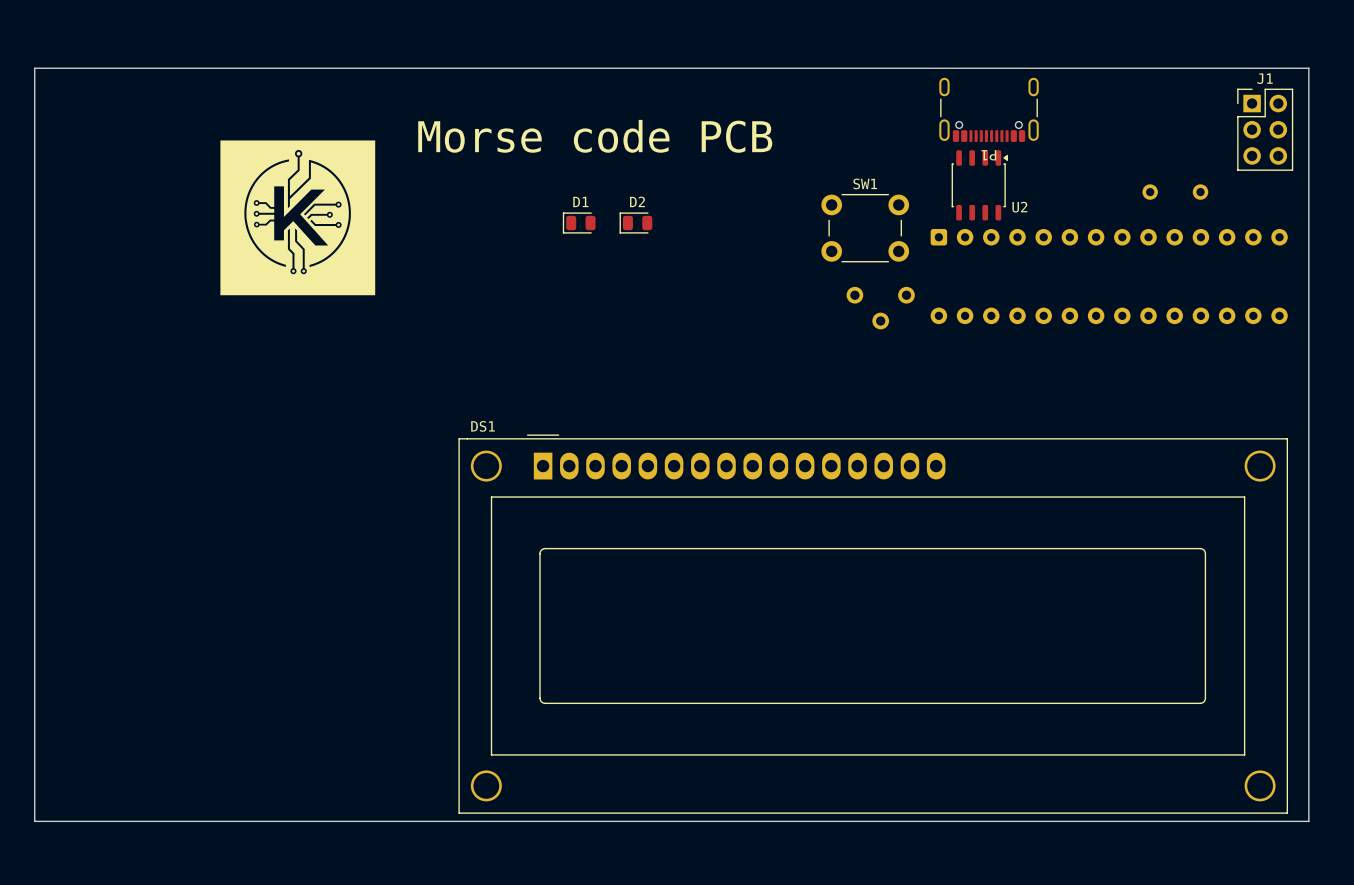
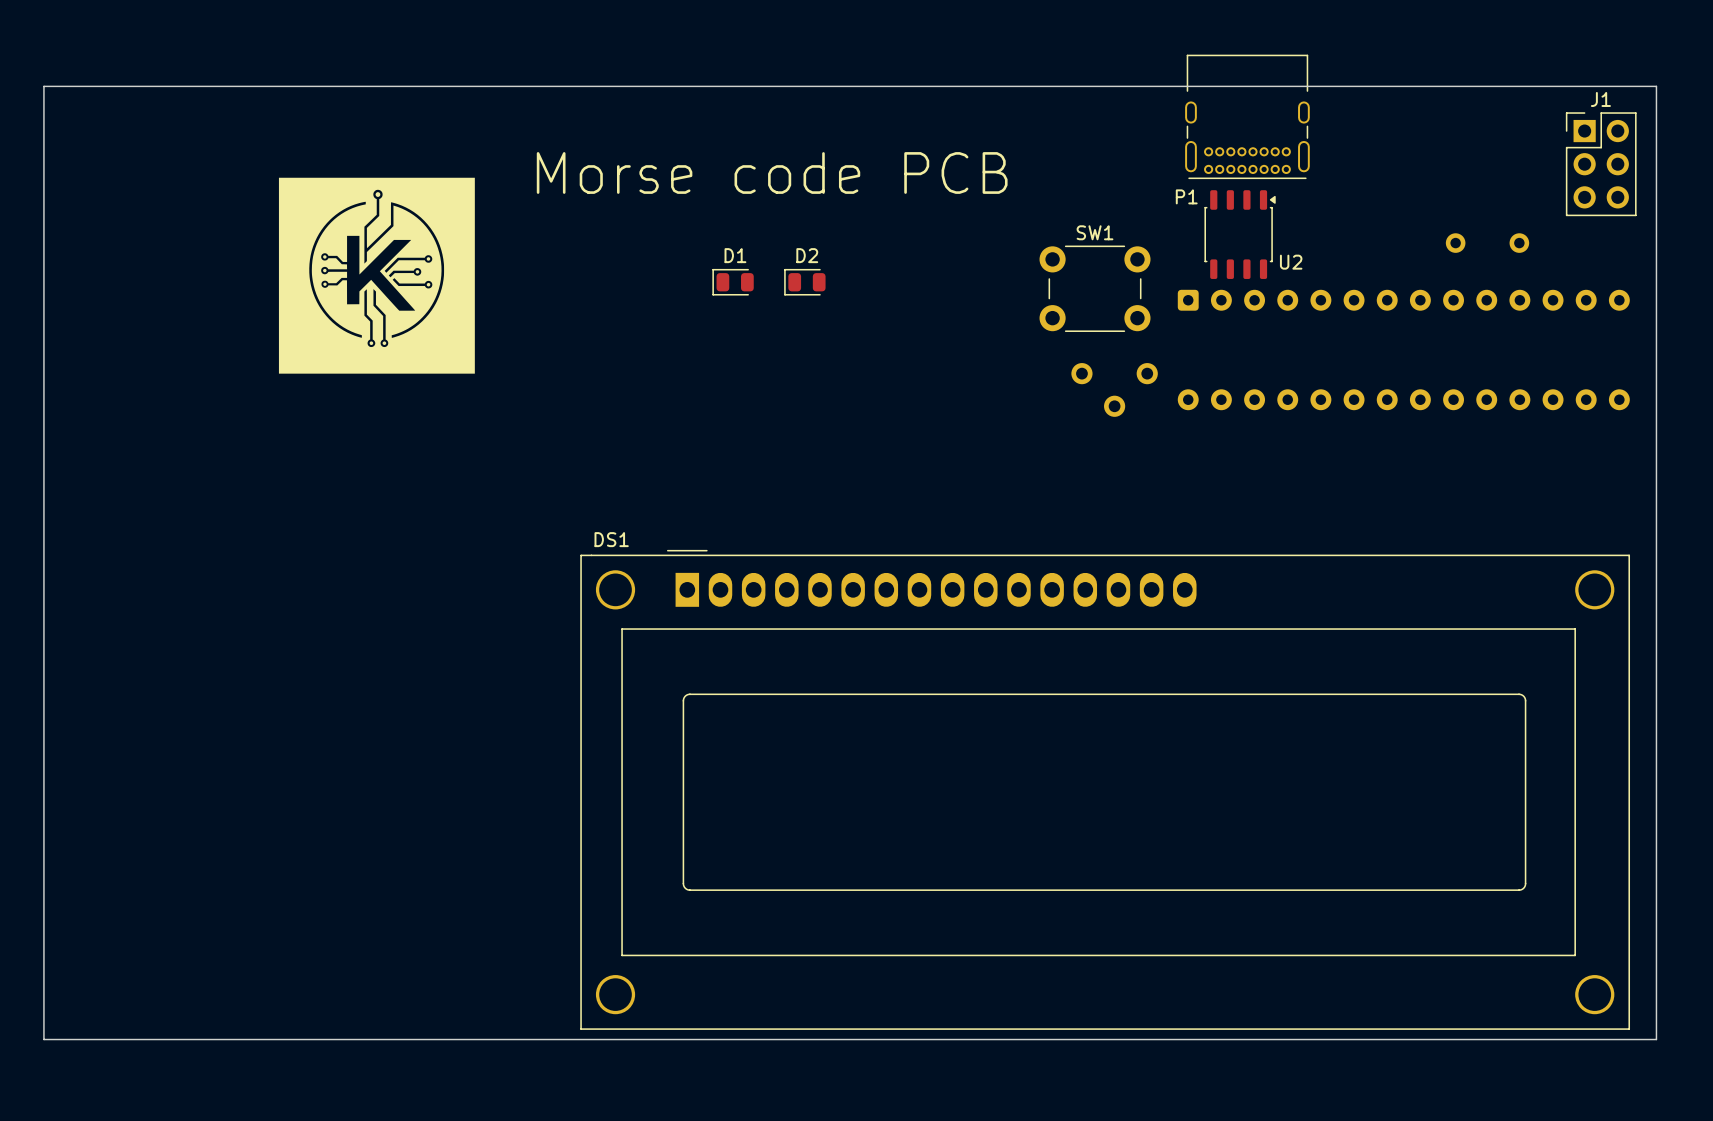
P1 footprint: [939, 77, 1039, 143] -> [1185, 54, 1310, 180]
P1 name position: P1 (988, 155) -> P1 (1186, 196)

